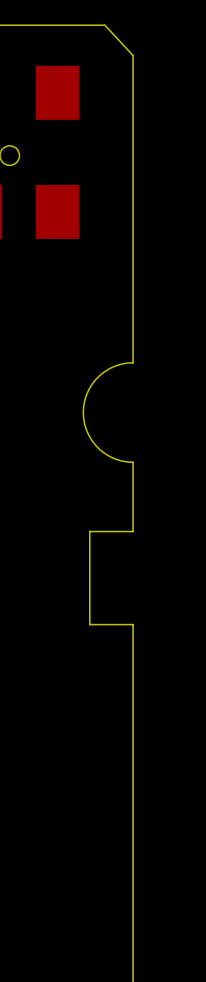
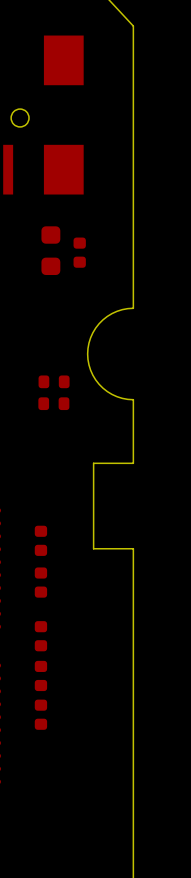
part: none -> (50, 250)
part: none -> (79, 252)
part: none -> (54, 381)
part: none -> (53, 403)
part: none -> (40, 540)
part: none -> (40, 582)
part: none -> (40, 636)
part: none -> (40, 675)
part: none -> (40, 714)

